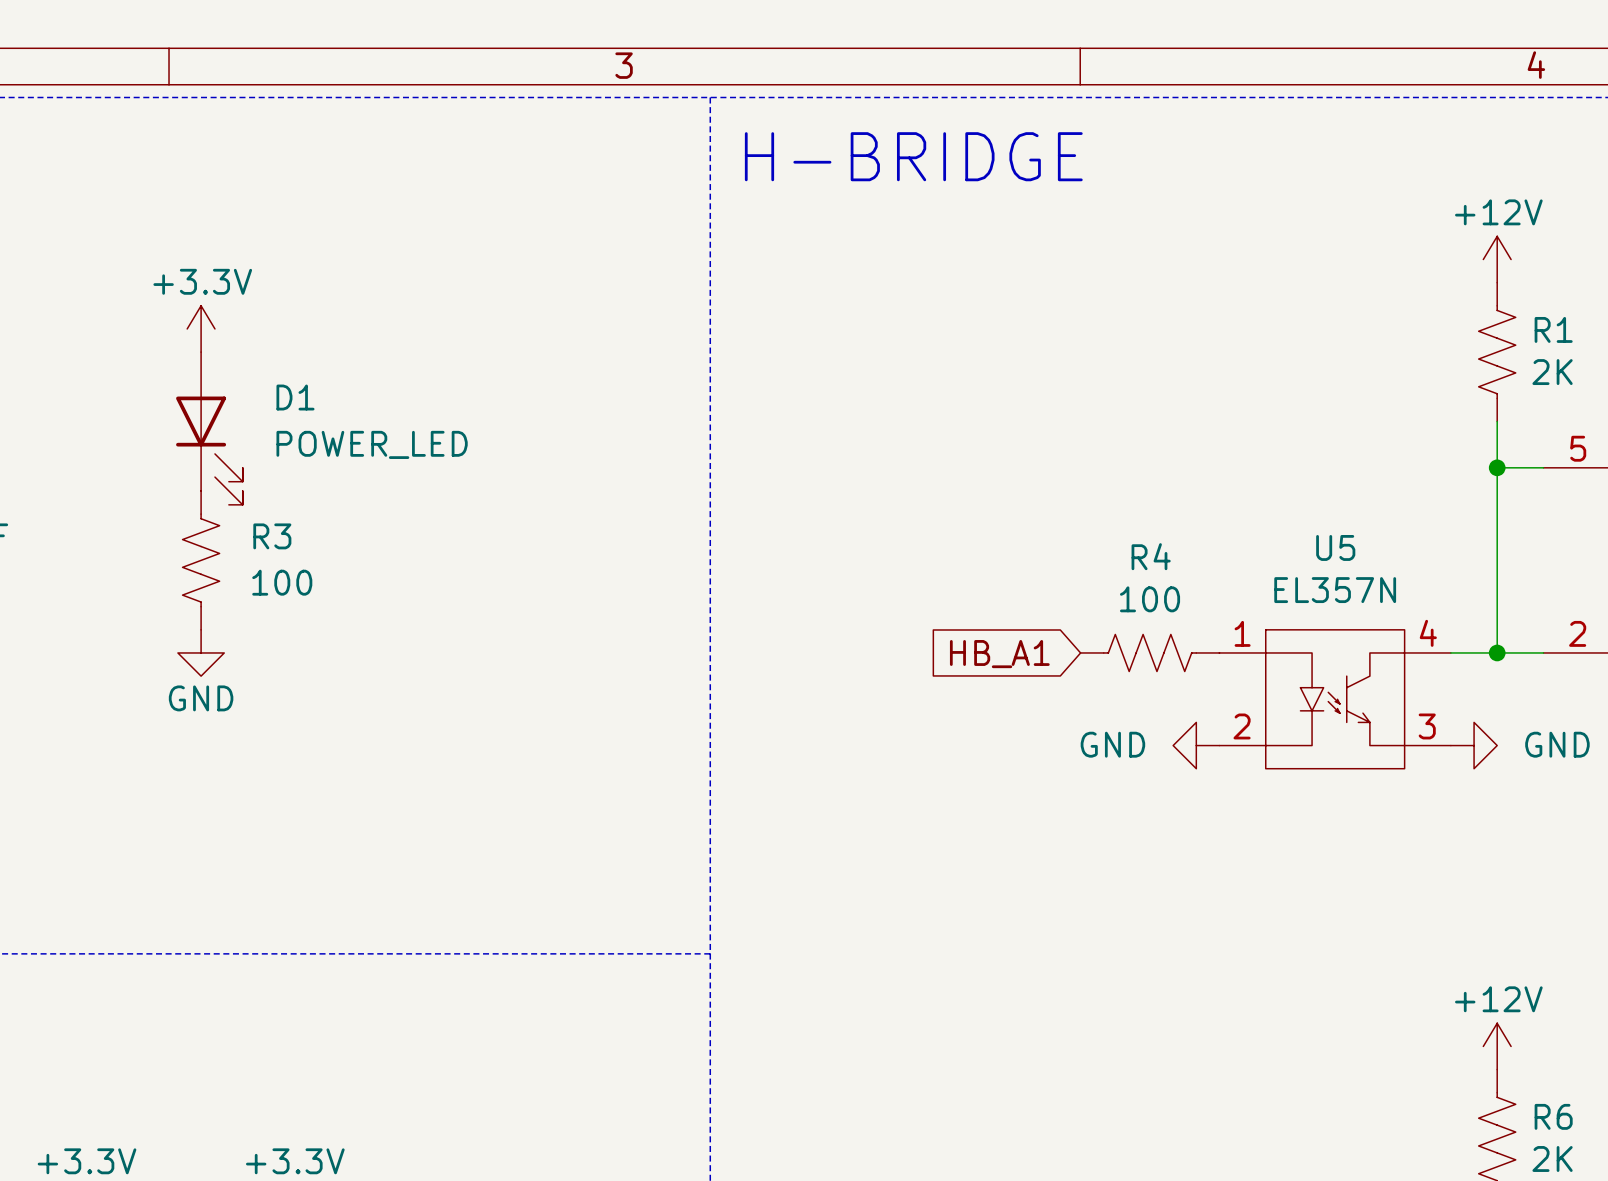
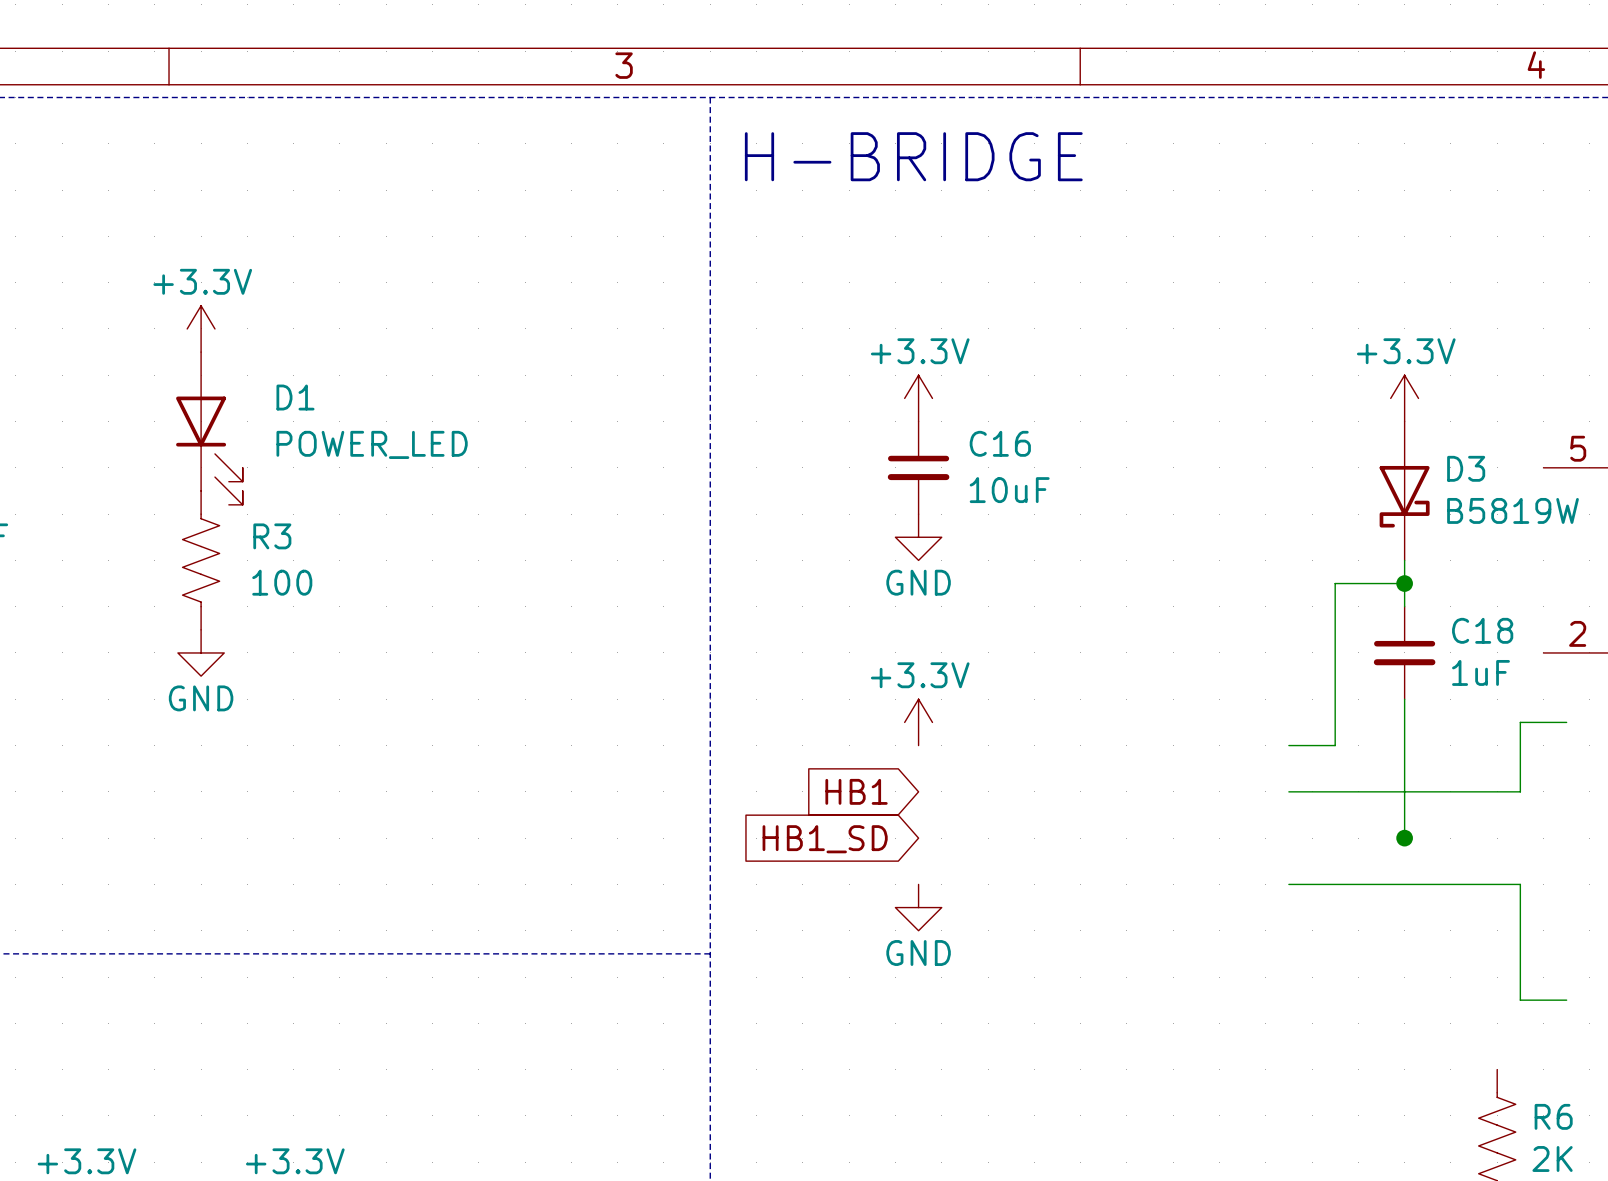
power symbol: +12V (1497, 259) -> none
R1: 2K (1497, 352) -> none
power symbol: none -> +3.3V (918, 398)
power symbol: none -> +3.3V (1404, 398)
wire: (1497, 421) (1497, 652) -> none
C16: none -> 10uF (918, 467)
wire: (1497, 467) (1543, 467) -> none
junction: (1497, 467) -> none
D3: none -> B5819W (1404, 490)
power symbol: none -> GND (918, 537)
wire: none -> (1404, 560) (1404, 606)
wire: none -> (1404, 583) (1335, 583) (1335, 745) (1288, 745)
junction: none -> (1404, 583)
R4: 100 (1150, 652) -> none
C18: none -> 1uF (1404, 652)
wire: (1450, 652) (1543, 652) -> none
junction: (1497, 652) -> none
global label: HB_A1 (999, 654) -> none
U5: EL357N (1335, 699) -> none
wire: none -> (1404, 699) (1404, 838)
power symbol: none -> +3.3V (918, 722)
wire: none -> (1566, 722) (1520, 722) (1520, 791) (1288, 791)
power symbol: GND (1196, 745) -> none
power symbol: GND (1474, 745) -> none
global label: none -> HB1 (856, 791)
junction: none -> (1404, 838)
global label: none -> HB1_SD (825, 839)
wire: none -> (1288, 884) (1520, 884) (1520, 1000) (1566, 1000)
power symbol: none -> GND (918, 907)
power symbol: +12V (1497, 1046) -> none

